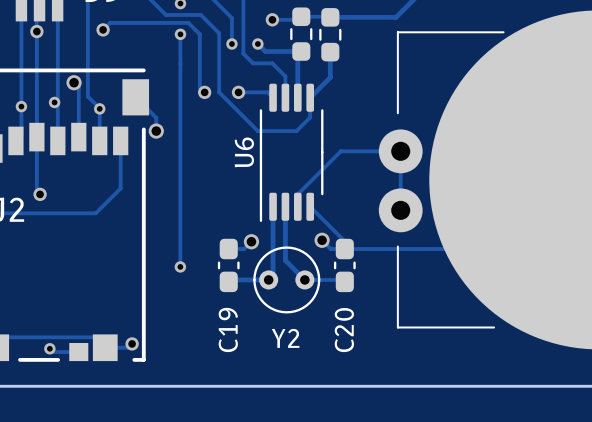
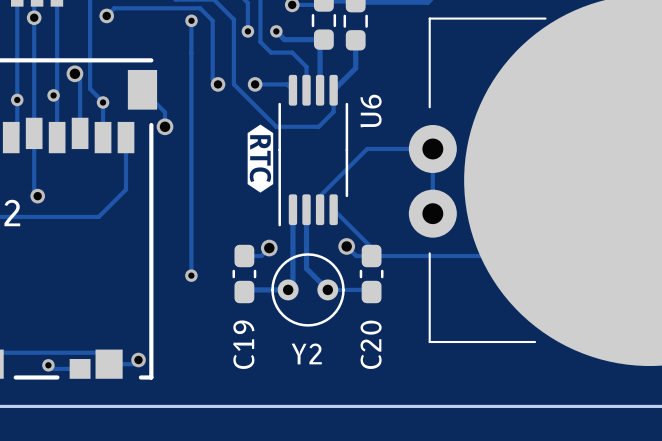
drawing: none -> [247, 124, 274, 193]
U6 name position: U6 (244, 152) -> U6 (371, 111)

